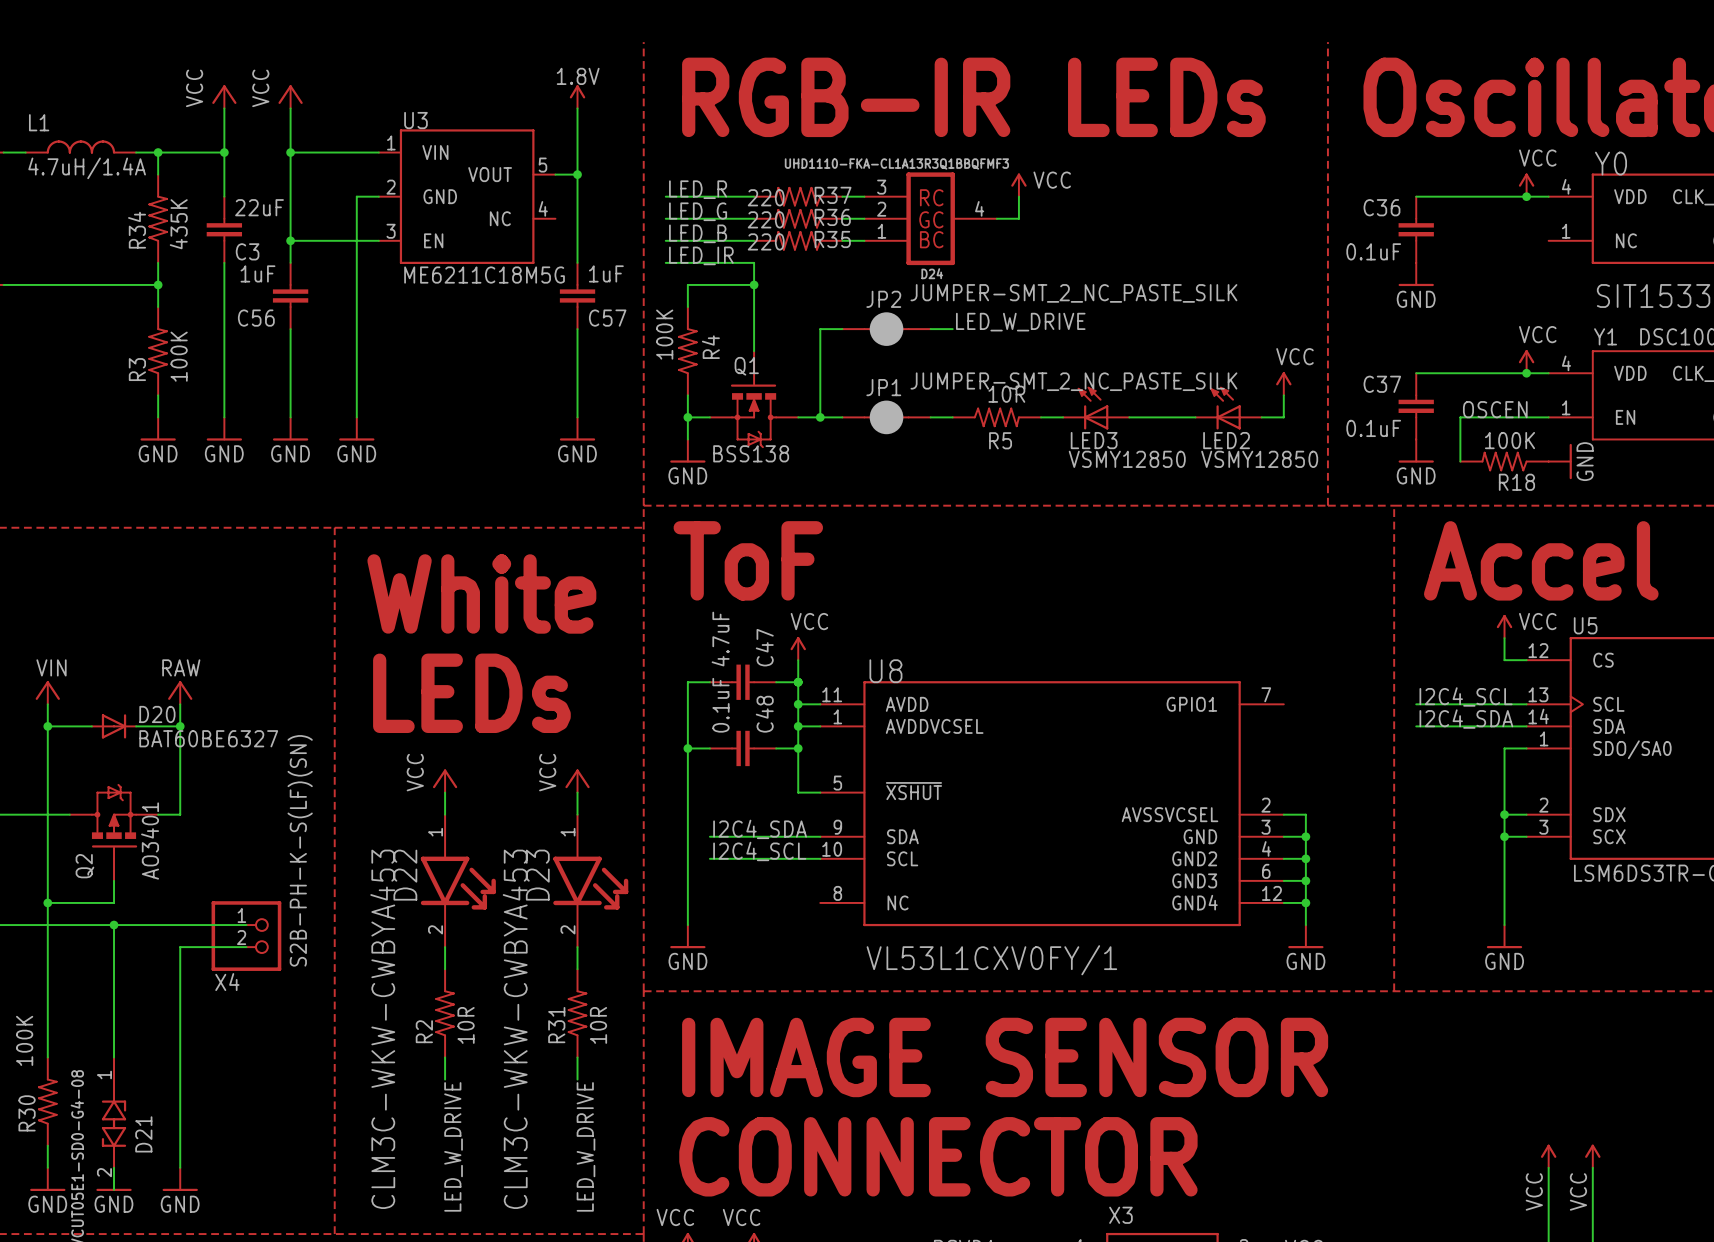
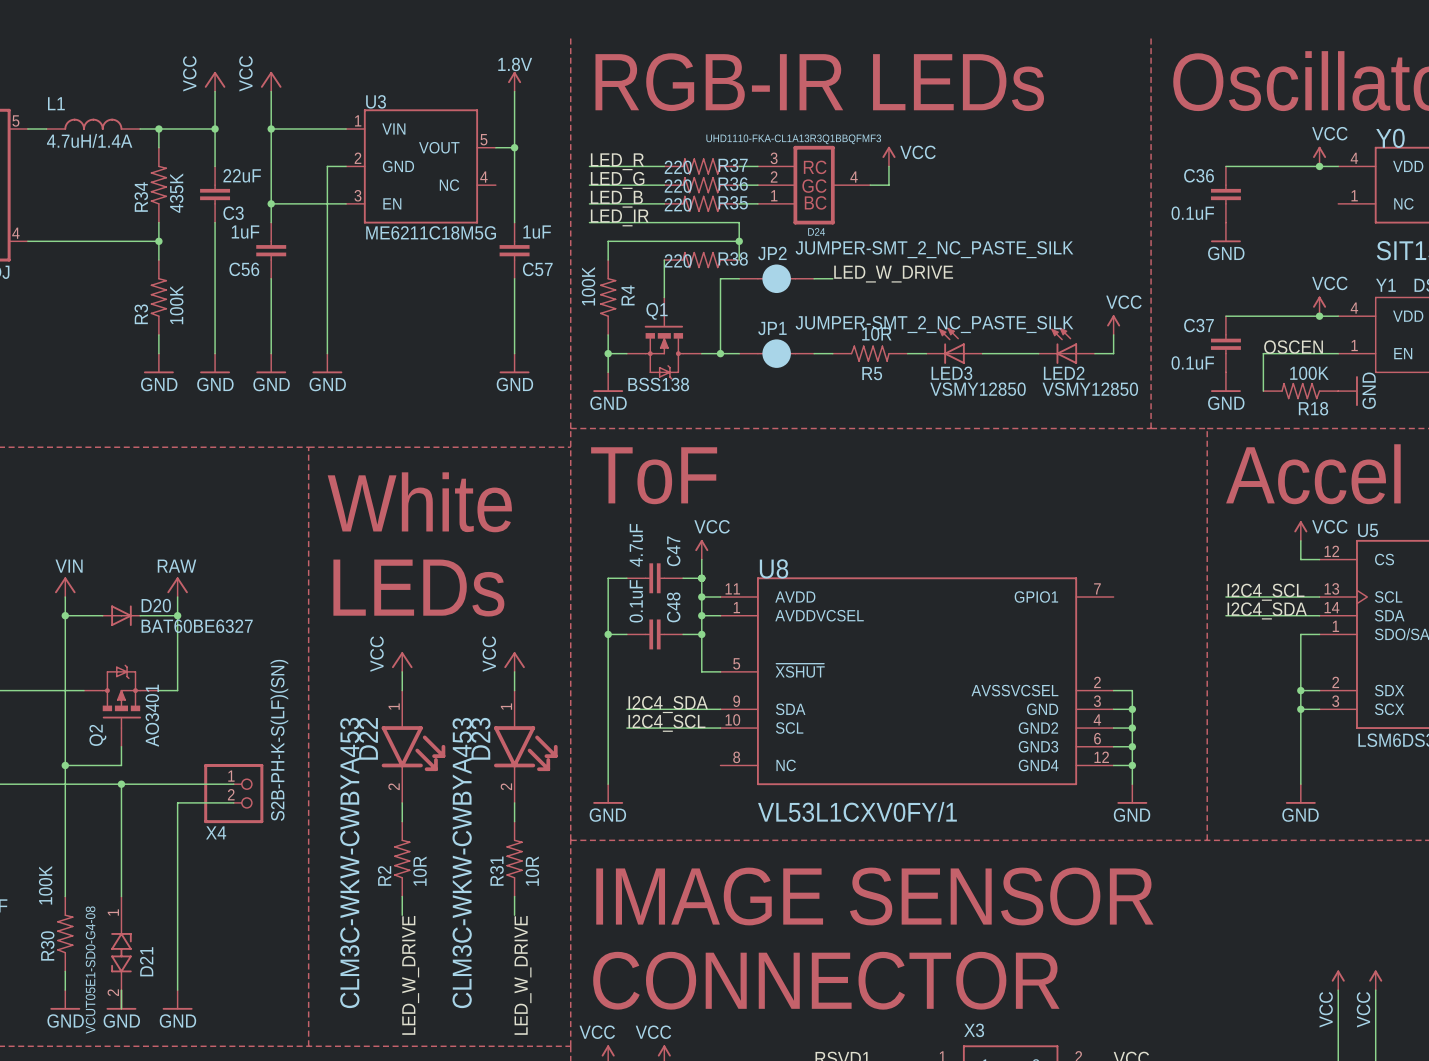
wire: (754, 262) (754, 307) -> (664, 222) (739, 222) (739, 260)
wire: none -> (664, 241) (739, 241)
junction: (754, 284) -> none
junction: none -> (739, 241)
R38: none -> 220 (701, 260)

